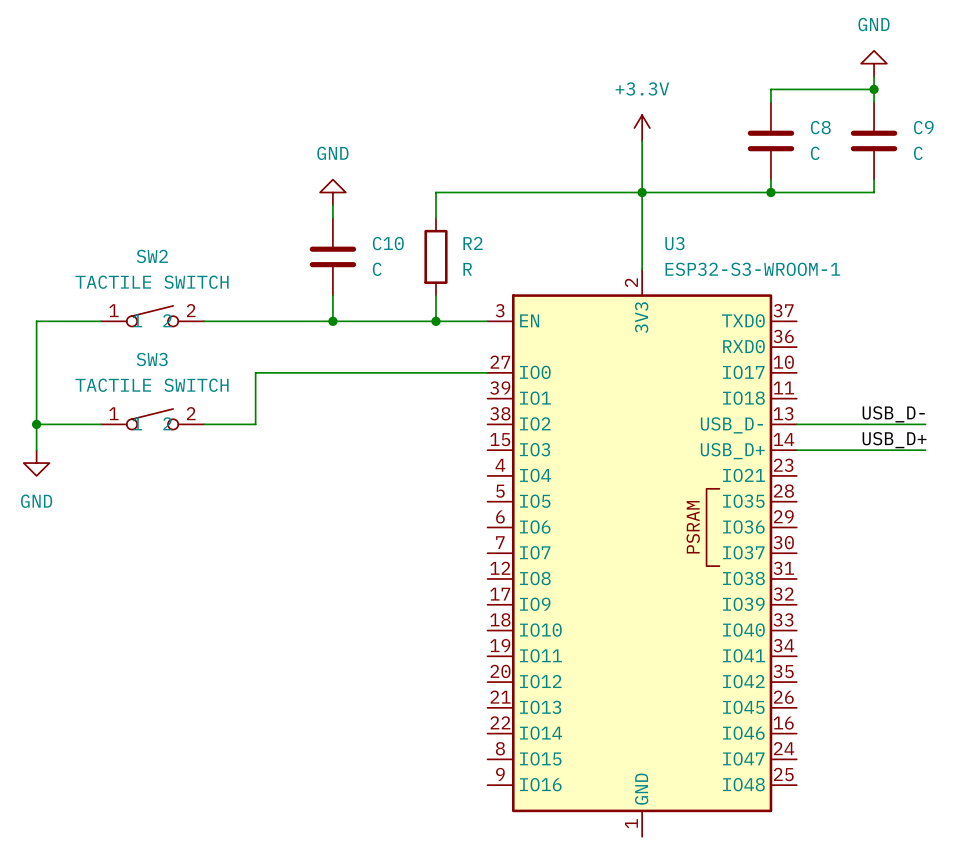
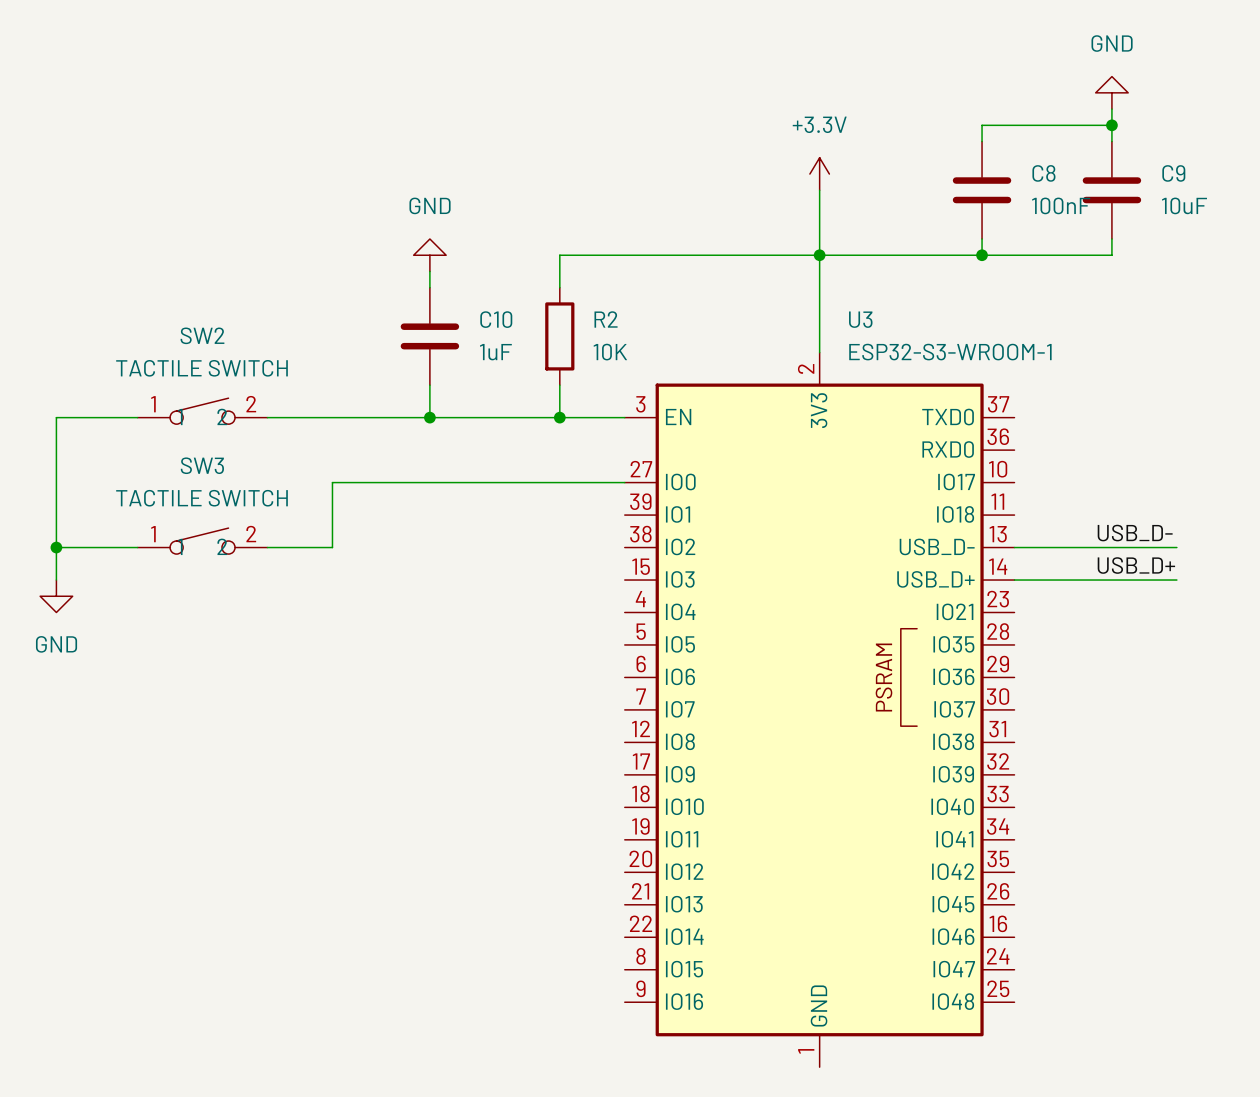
C8 value: C (815, 153) -> 100nF (1061, 205)
C9 value: C (918, 153) -> 10uF (1184, 205)
C10 value: C (377, 269) -> 1uF (495, 352)
R2 value: R (467, 269) -> 10K (610, 352)

